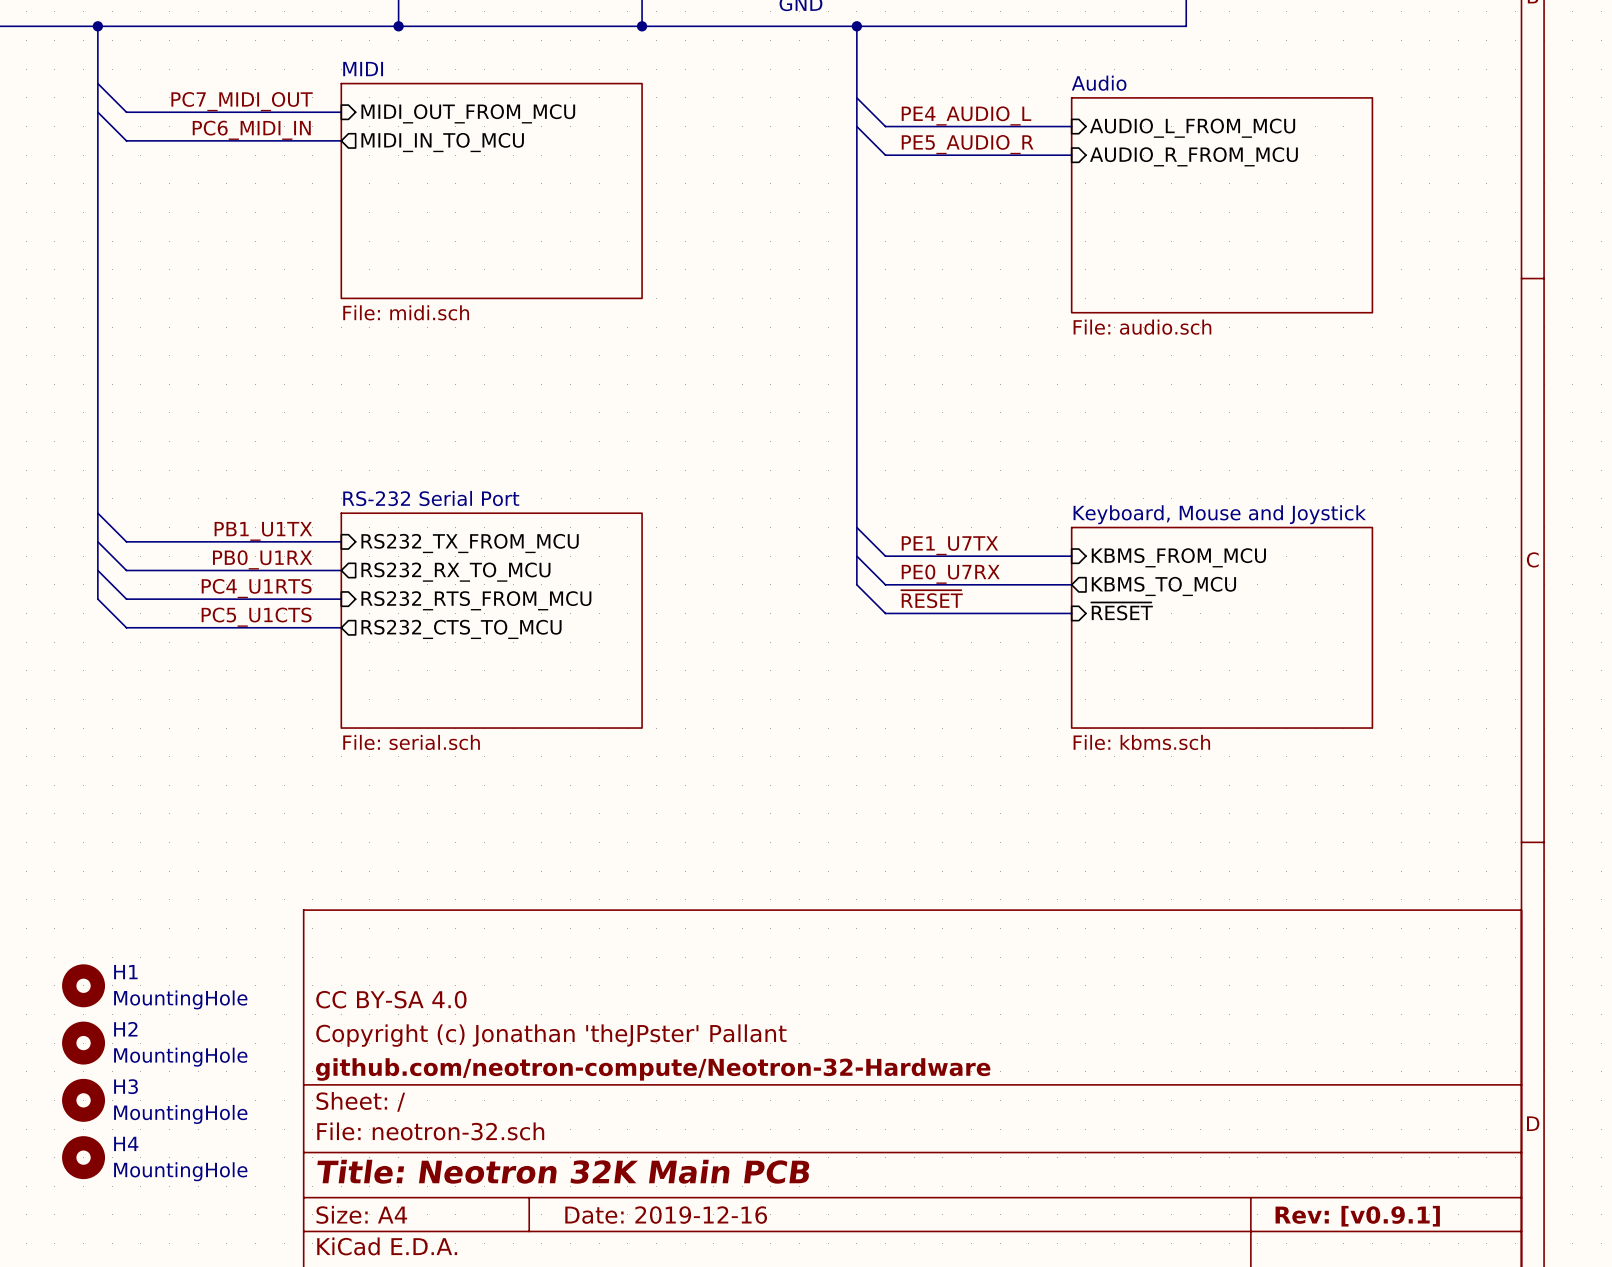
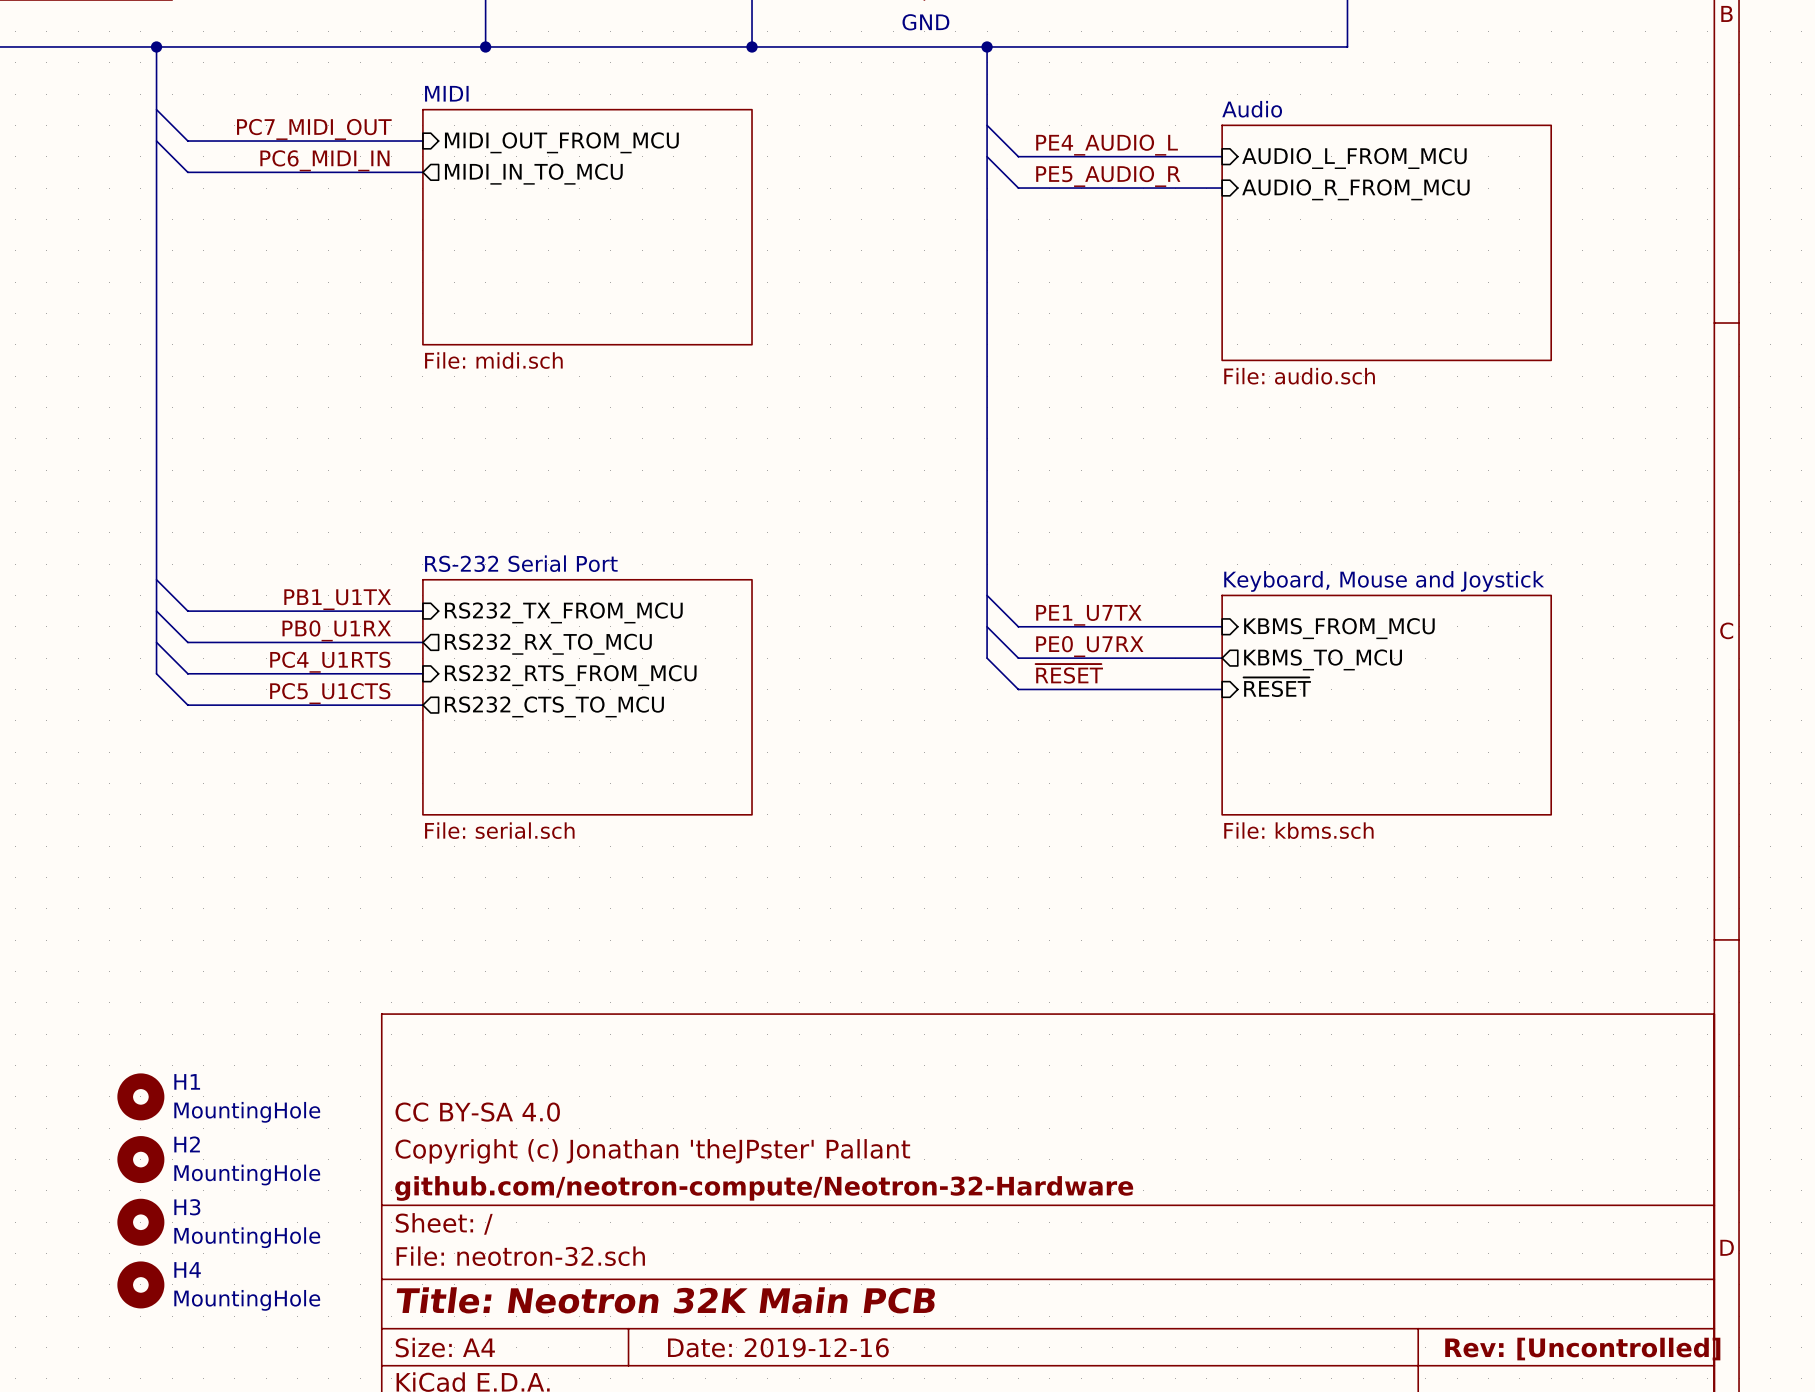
title block: Rev: [v0.9.1] (1357, 1216) -> Rev: [Uncontrolled] (1582, 1349)

